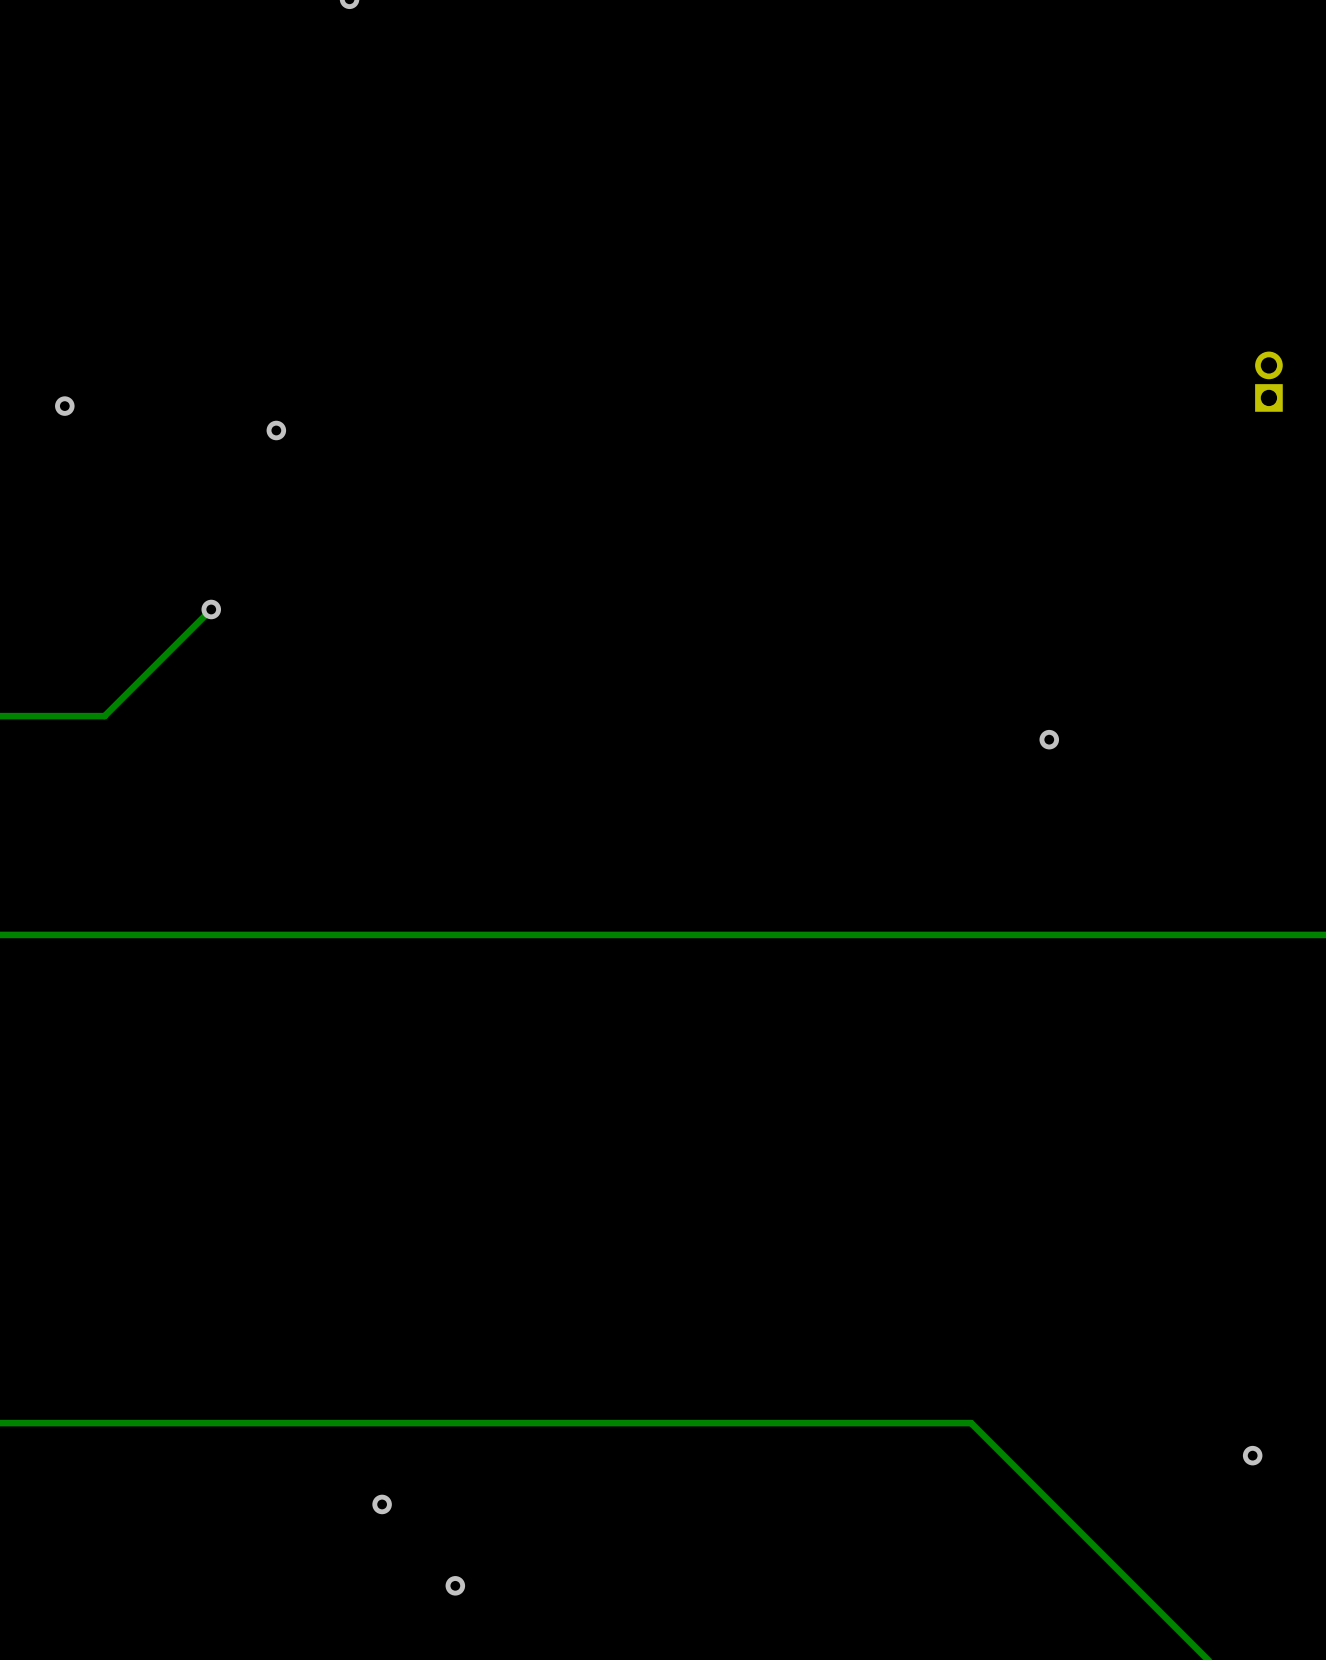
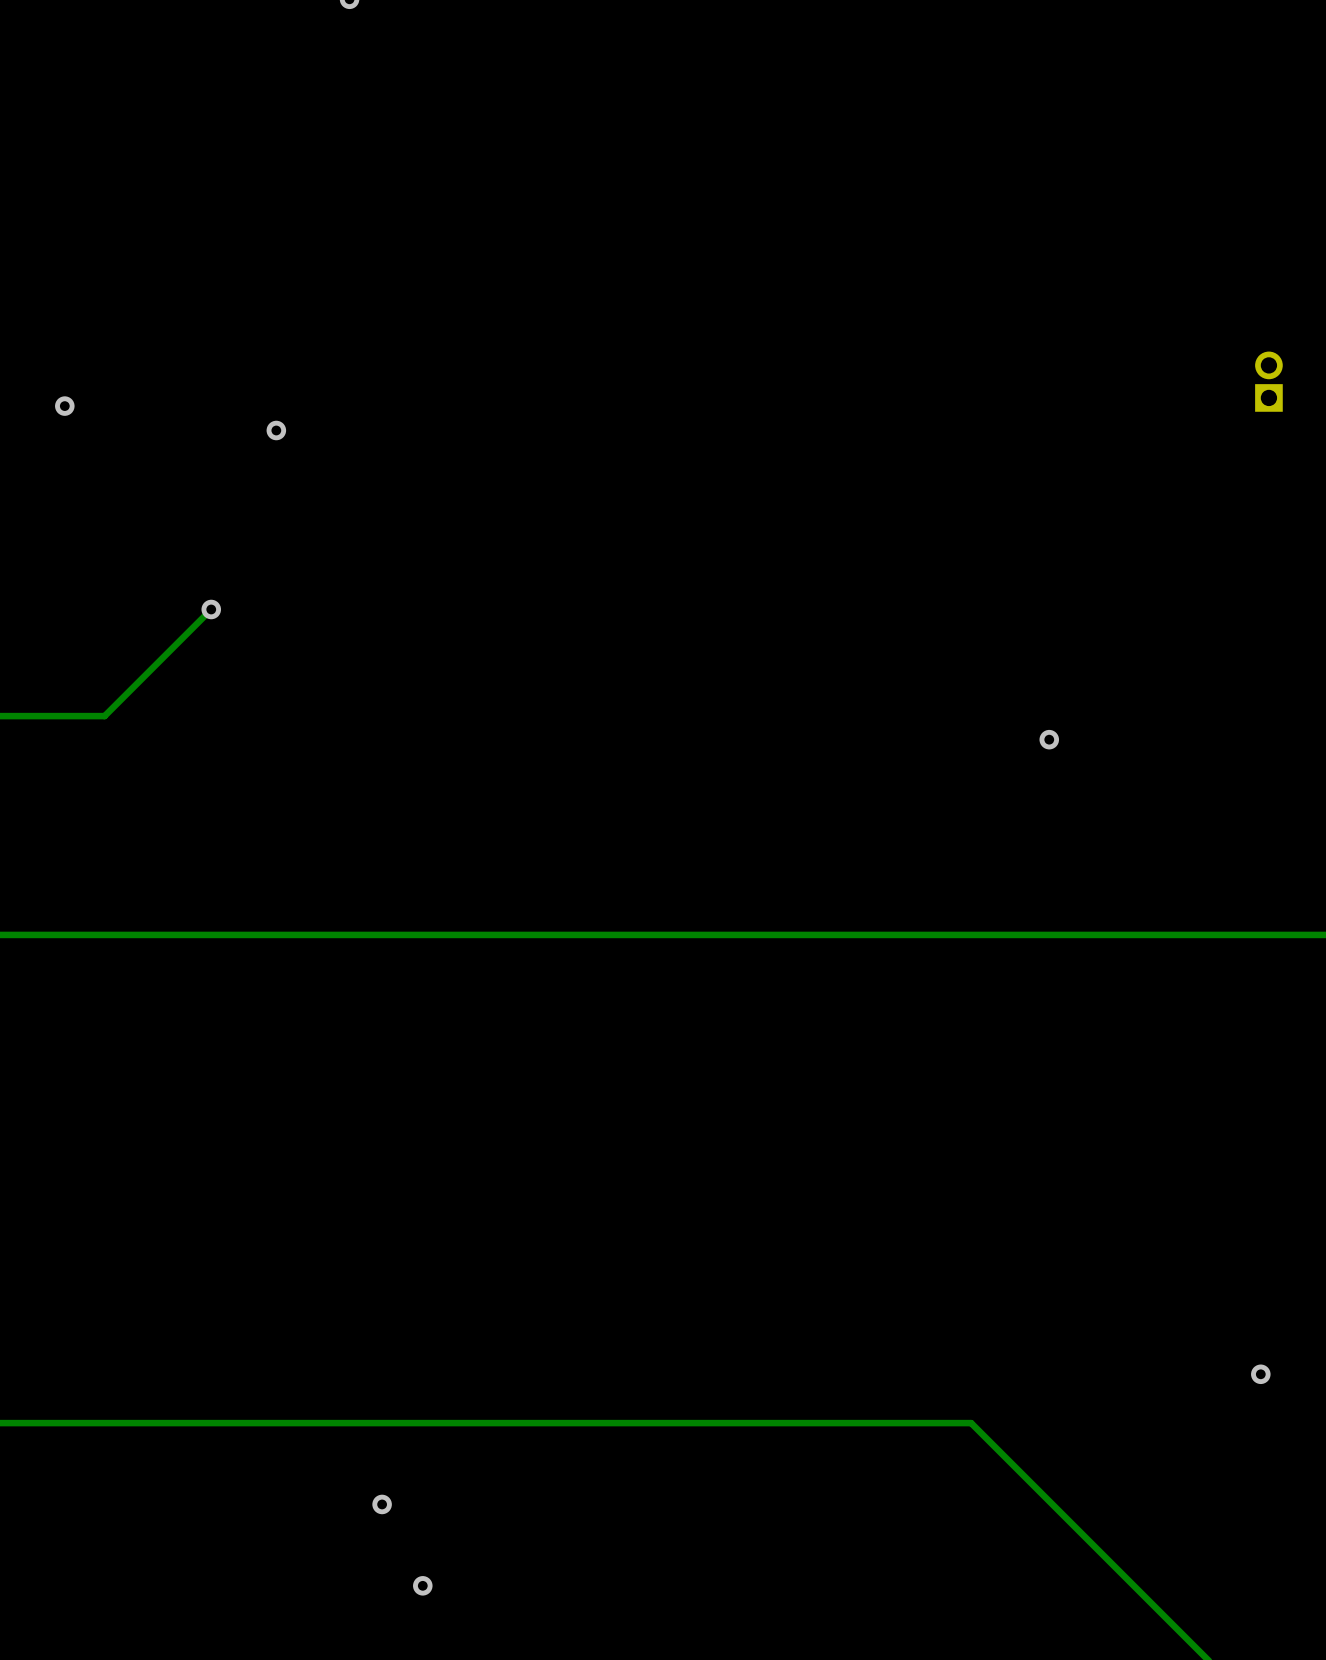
via position: (1252, 1455) -> (1260, 1374)
via position: (455, 1585) -> (422, 1585)

